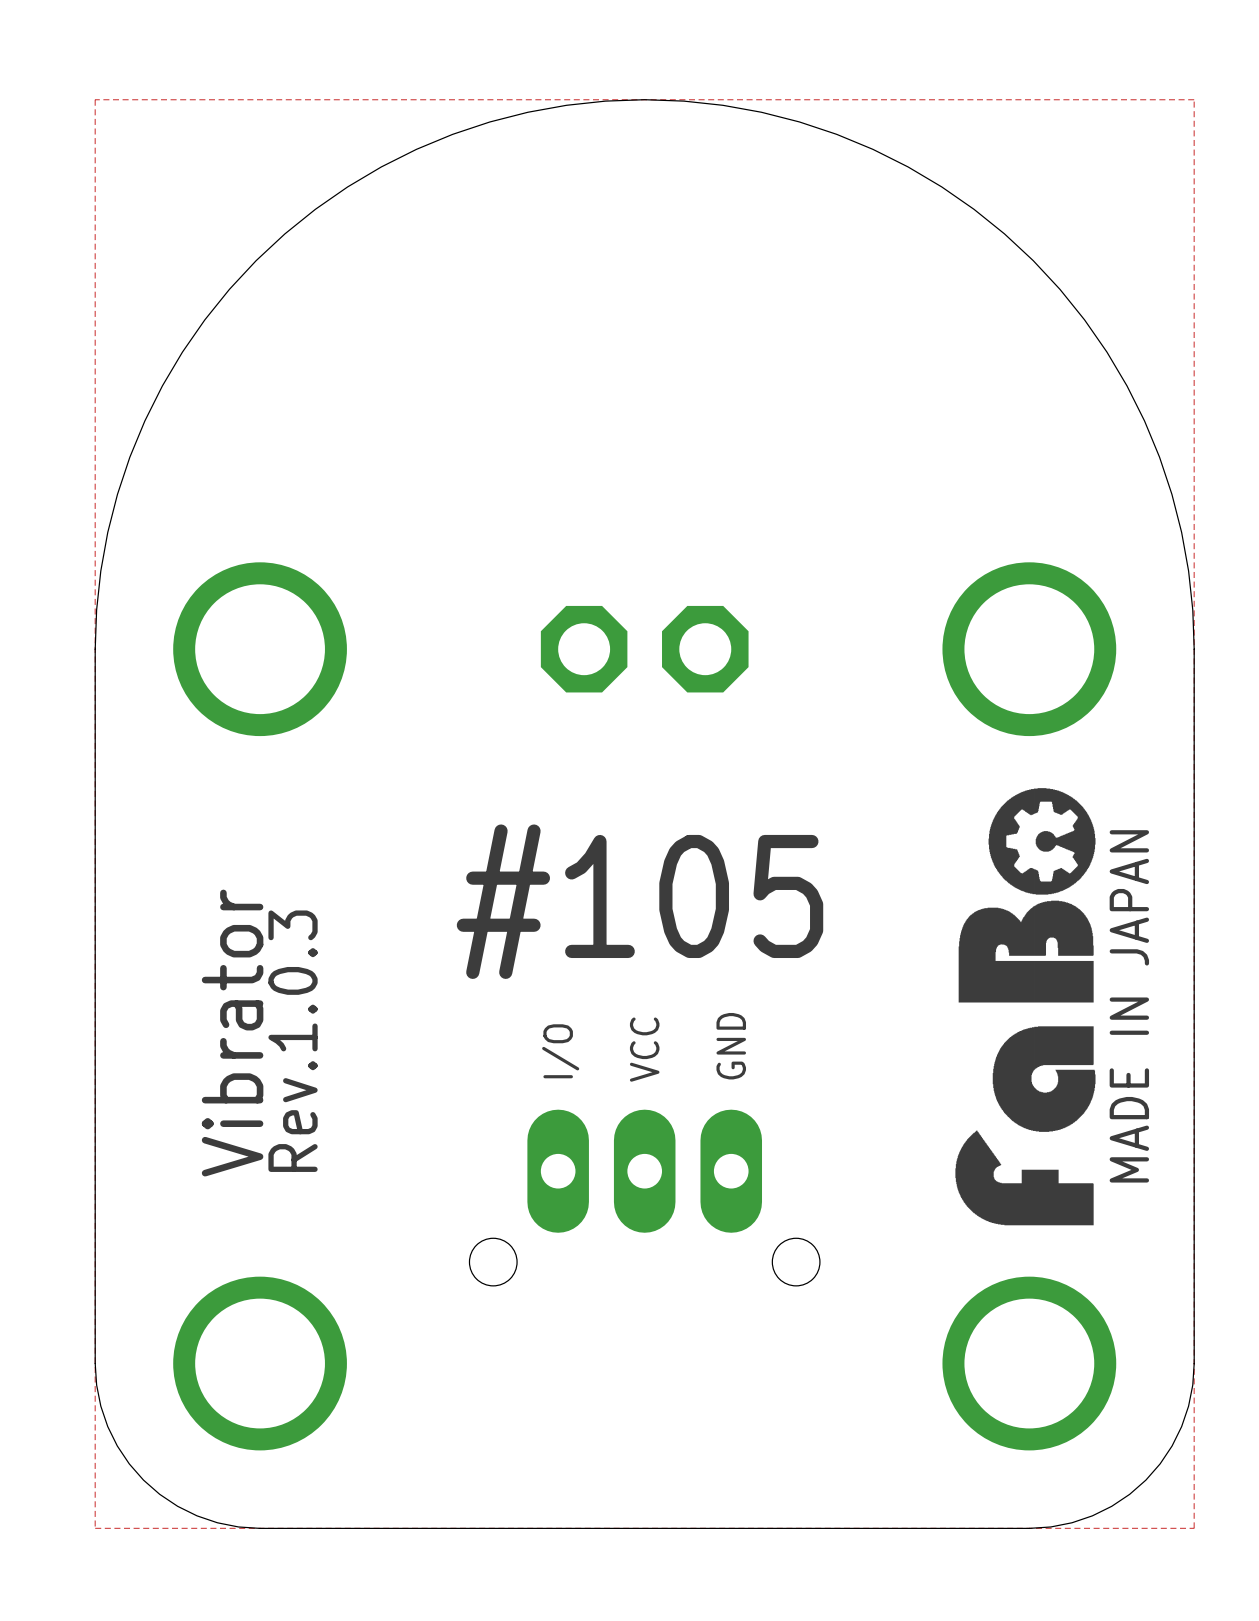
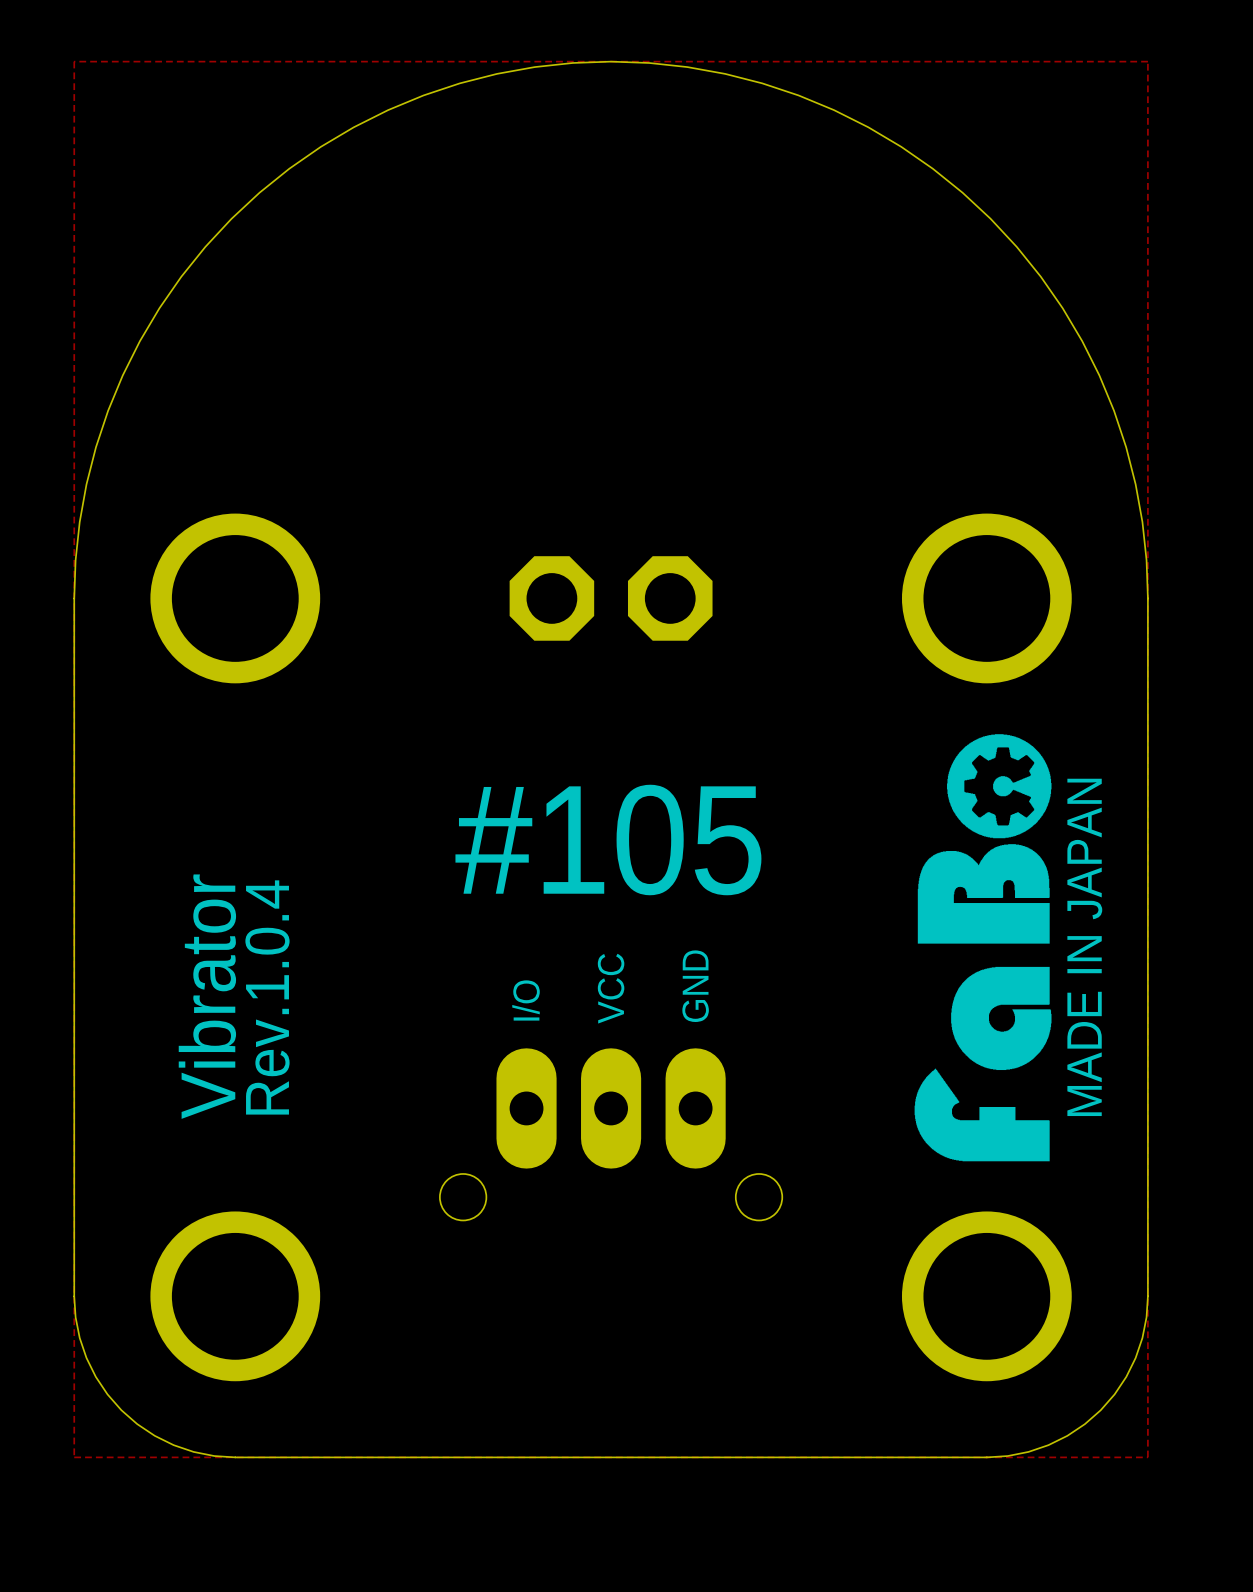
text: Rev.1.0.3 (293, 1041) -> Rev.1.0.4 (267, 997)

